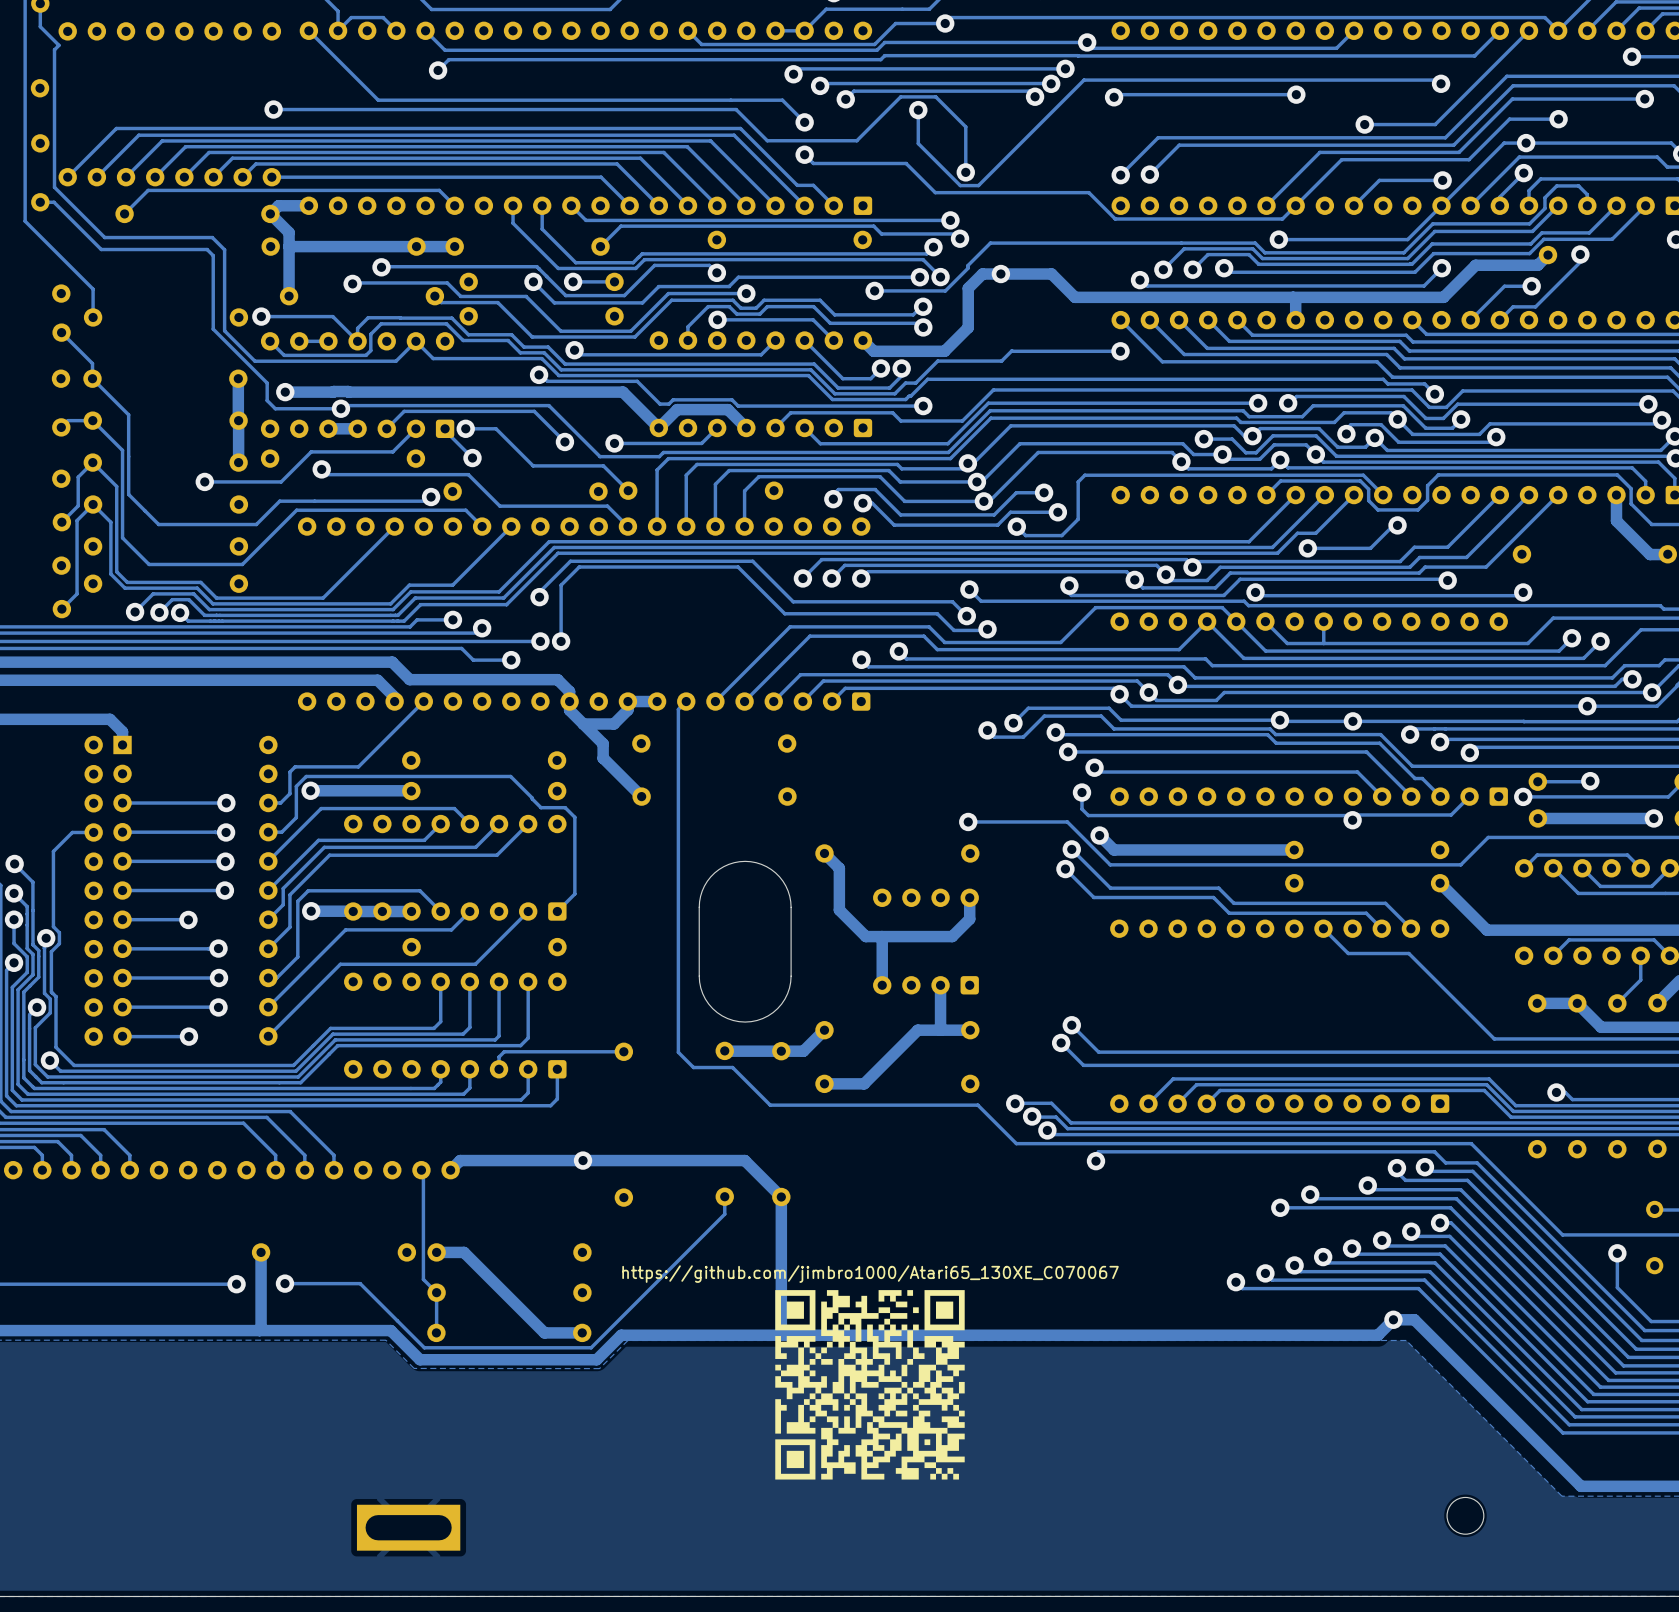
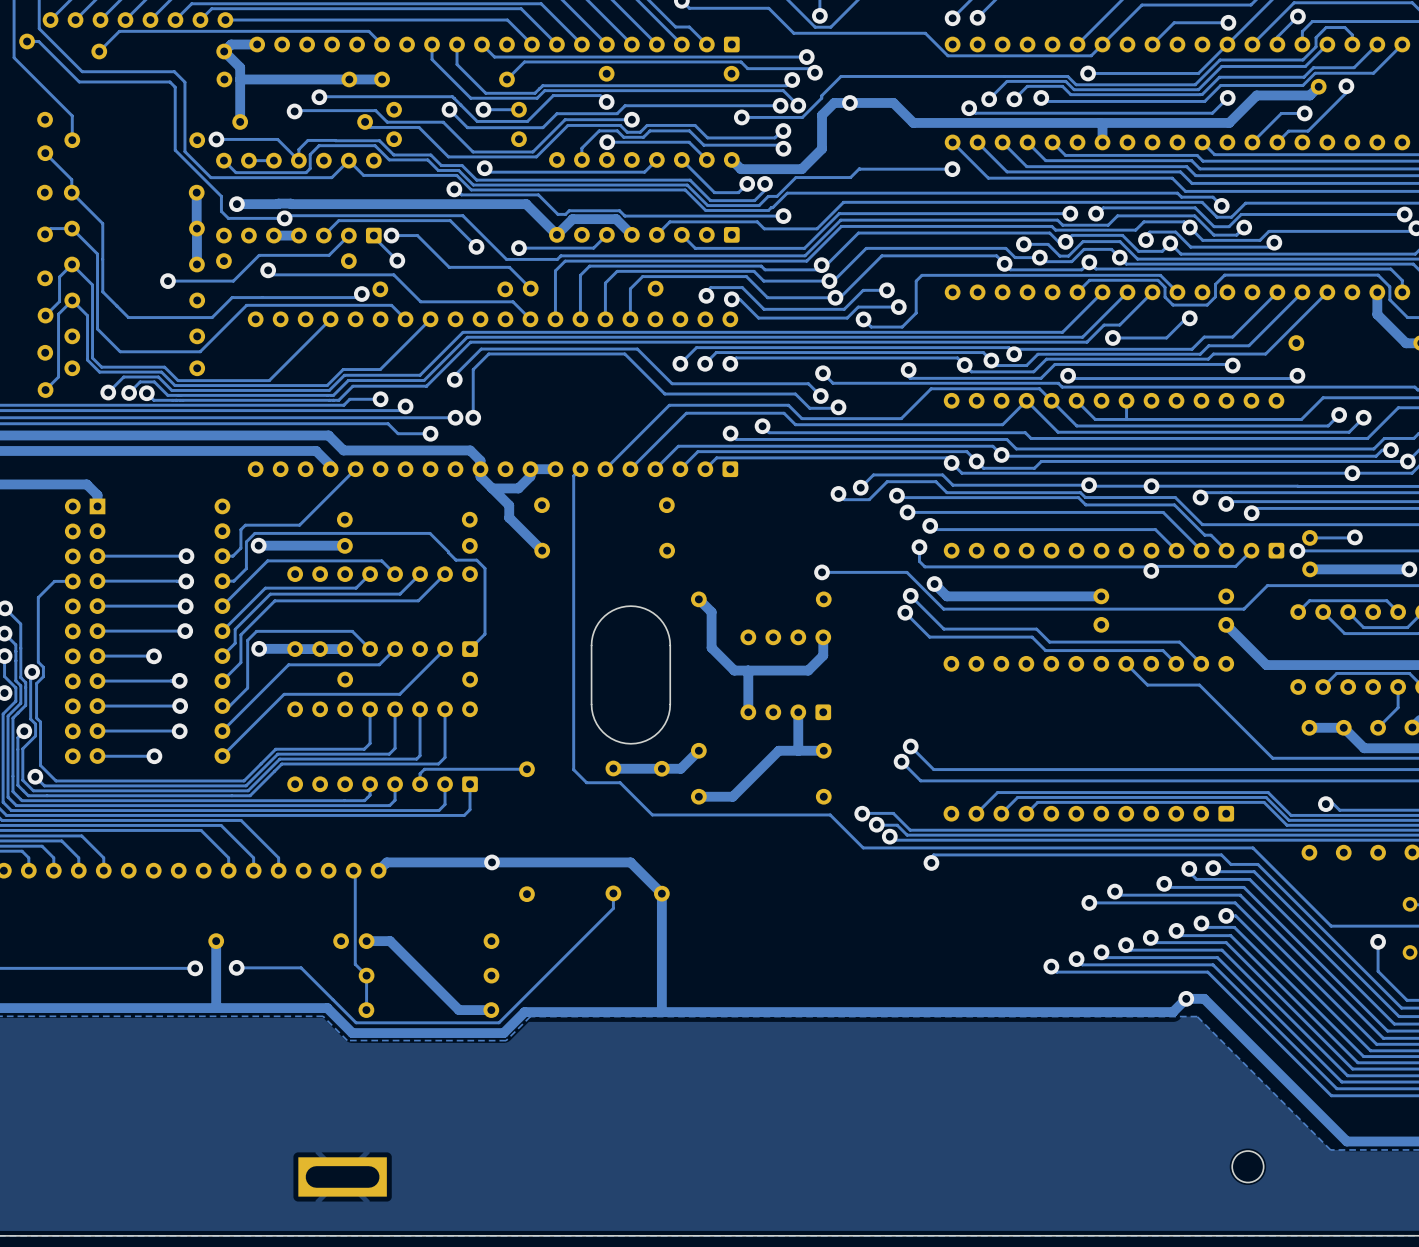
drawing: [775, 1290, 965, 1480] -> none

